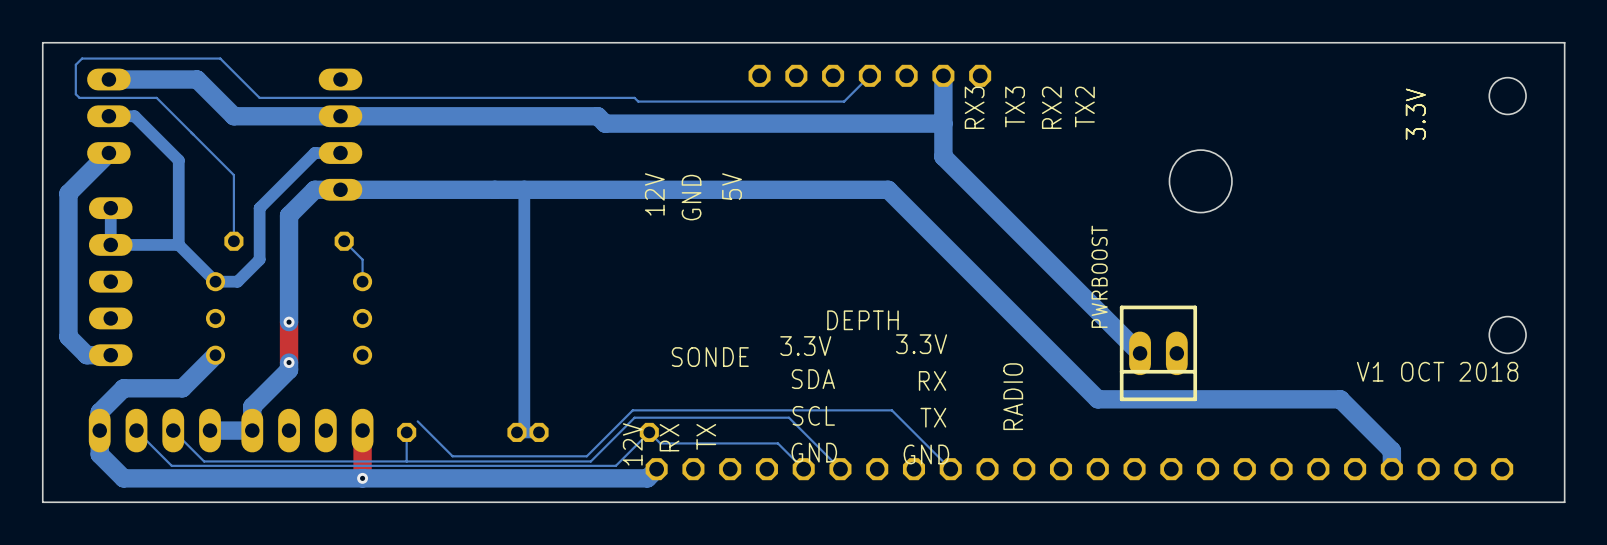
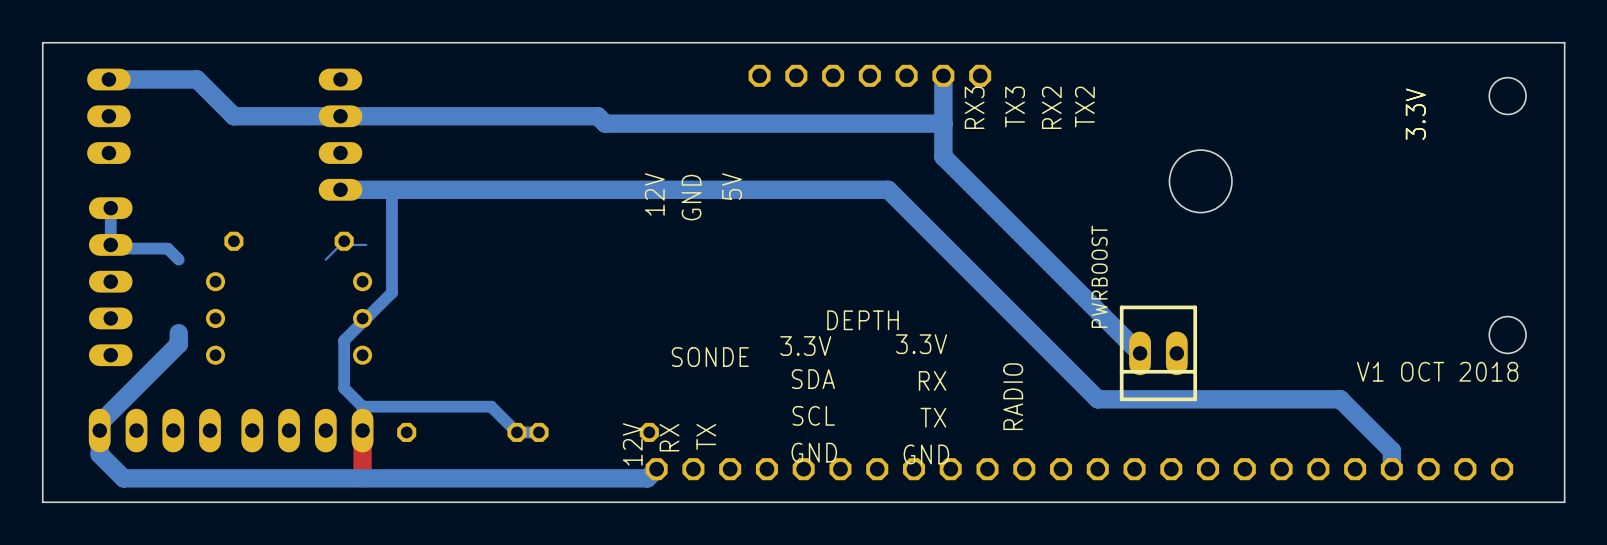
bottom track: (869, 75) (844, 101) (638, 101) (634, 97) (259, 97) (220, 58) (82, 58) (75, 64) (75, 94) (79, 97) (156, 97) (233, 175) (233, 241) -> none
bottom track: (108, 116) (134, 116) (178, 160) (178, 244) -> none
bottom track: (108, 153) (68, 193) (68, 336) (86, 355) (110, 355) -> none
bottom track: (340, 153) (314, 153) (259, 208) (259, 259) (237, 281) (215, 281) (178, 244) -> none
bottom track: (340, 189) (314, 189) (289, 215) (289, 322) -> none
bottom track: none -> (391, 189) (391, 292) (344, 340) (344, 388) (362, 406)
bottom track: (524, 189) (524, 428) (520, 432) -> none
bottom track: (344, 241) (362, 259) (362, 281) -> none
bottom track: (178, 244) (110, 244) -> (178, 259) (167, 248) (110, 248) (110, 244)
bottom track: none -> (366, 244) (340, 244) (325, 259)
top track: (289, 322) (289, 362) -> none
via: (289, 322) -> none
bottom track: (215, 355) (182, 388) (123, 388) (99, 412) (99, 423) -> (178, 333) (178, 344) (99, 423)
bottom track: (289, 362) (289, 369) (252, 406) (252, 430) (210, 430) -> none
via: (289, 362) -> none
bottom track: none -> (362, 406) (491, 406) (516, 432)
bottom track: (417, 421) (452, 456) (586, 456) (632, 410) (891, 410) (950, 469) -> none
bottom track: (136, 430) (171, 465) (615, 465) (649, 432) (660, 443) (777, 443) (803, 469) -> none
bottom track: (173, 430) (204, 461) (590, 461) (634, 417) (788, 417) (840, 469) -> none
bottom track: (406, 432) (406, 461) -> none
via: (362, 478) -> none

